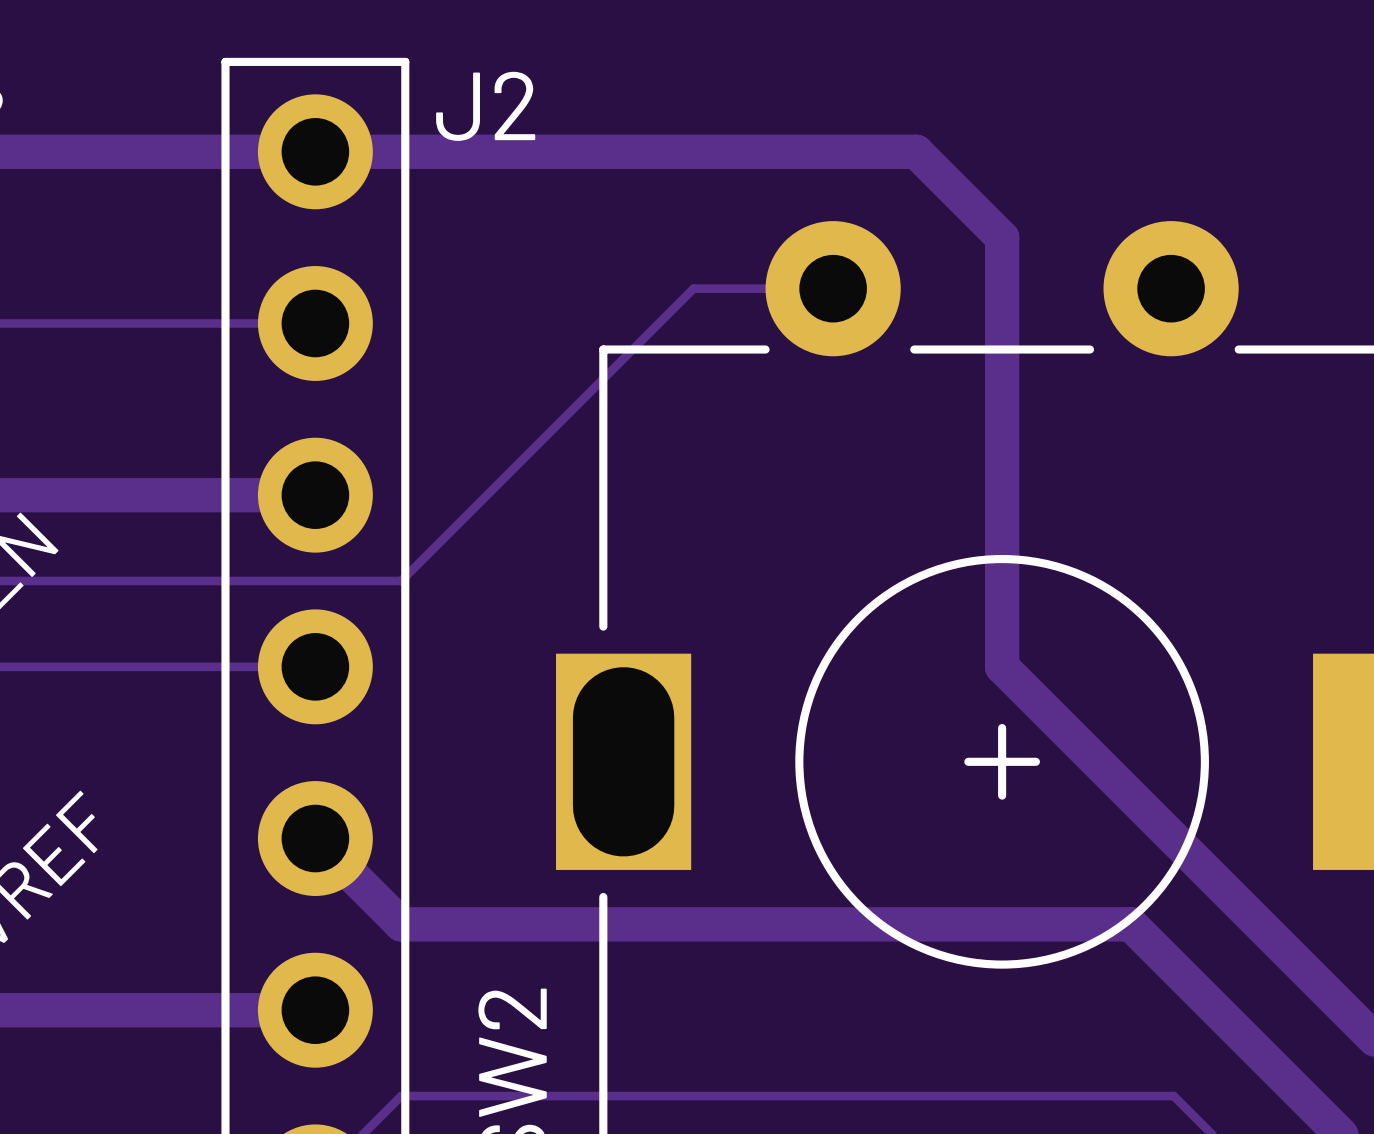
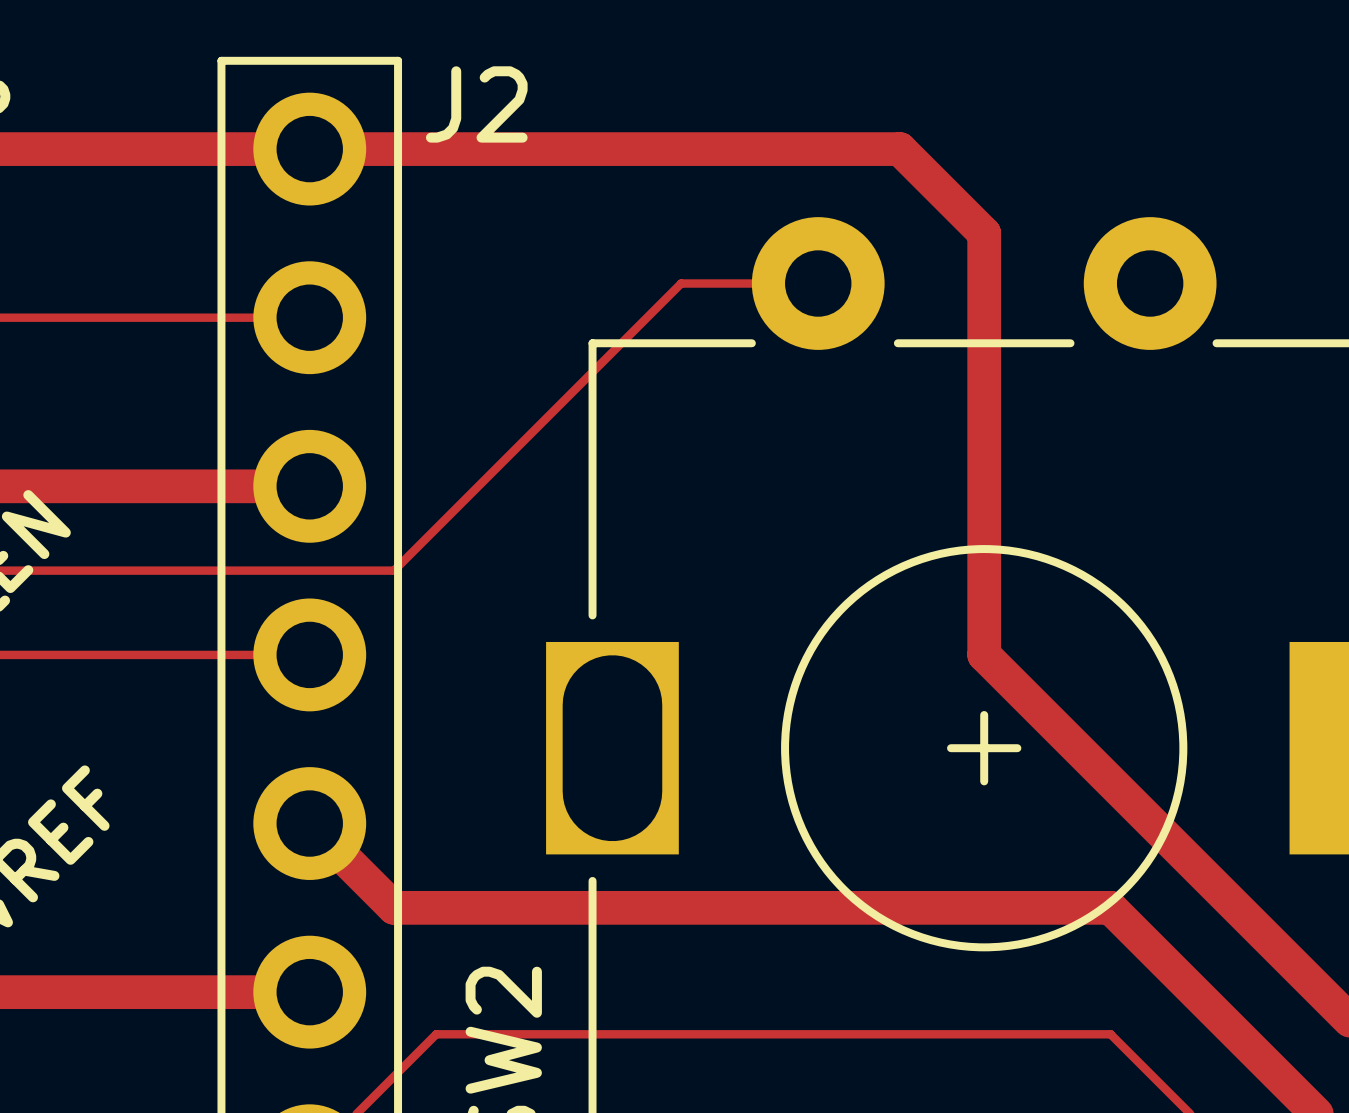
track: (401, 1096) (1173, 1096) -> (394, 1076) (436, 1034) (1110, 1034) (1152, 1076)

